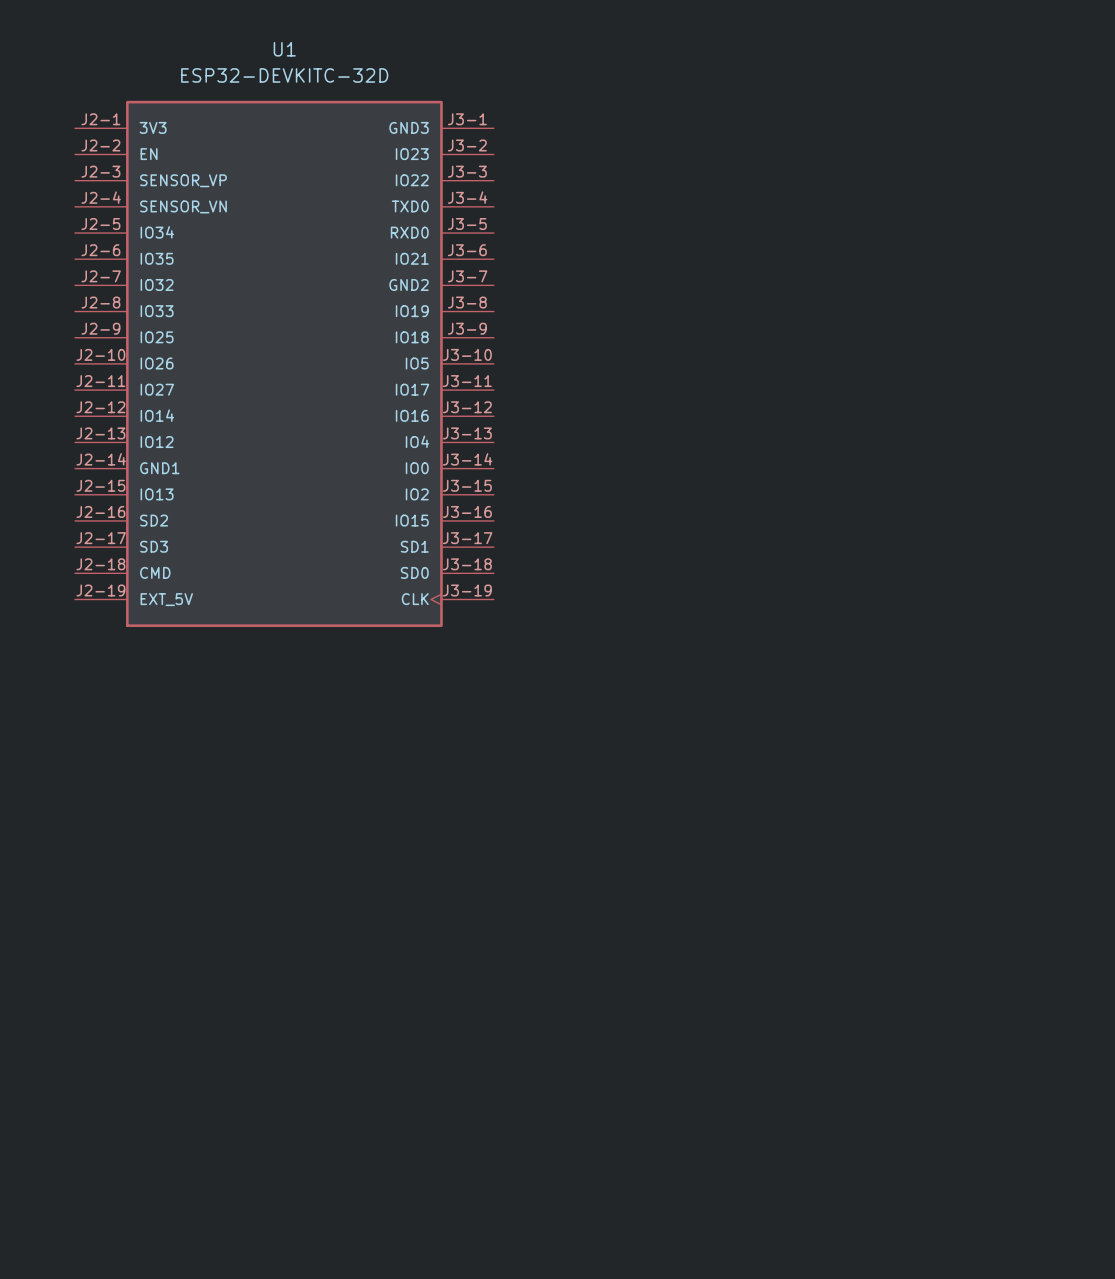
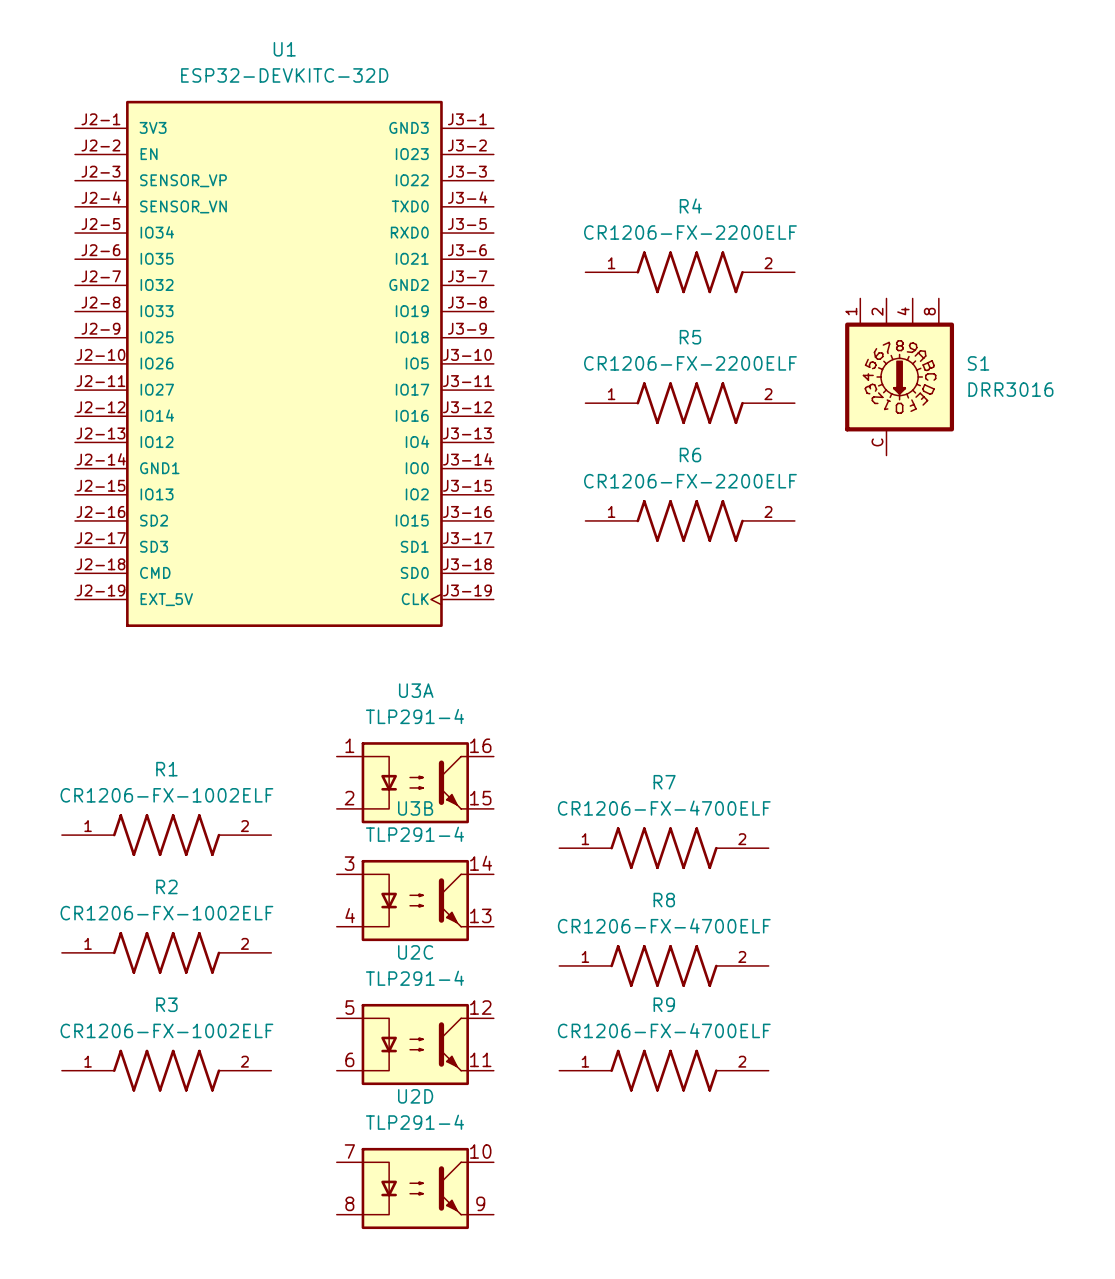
R4: none -> CR1206-FX-2200ELF (690, 272)
S1: none -> DRR3016 (899, 376)
R5: none -> CR1206-FX-2200ELF (690, 403)
R6: none -> CR1206-FX-2200ELF (690, 520)
U3A: none -> TLP291-4 (415, 782)
R1: none -> CR1206-FX-1002ELF (166, 835)
R7: none -> CR1206-FX-4700ELF (663, 848)
U3B: none -> TLP291-4 (415, 900)
R2: none -> CR1206-FX-1002ELF (166, 952)
R8: none -> CR1206-FX-4700ELF (663, 965)
U2C: none -> TLP291-4 (415, 1044)
R3: none -> CR1206-FX-1002ELF (166, 1070)
R9: none -> CR1206-FX-4700ELF (663, 1070)
U2D: none -> TLP291-4 (415, 1188)

